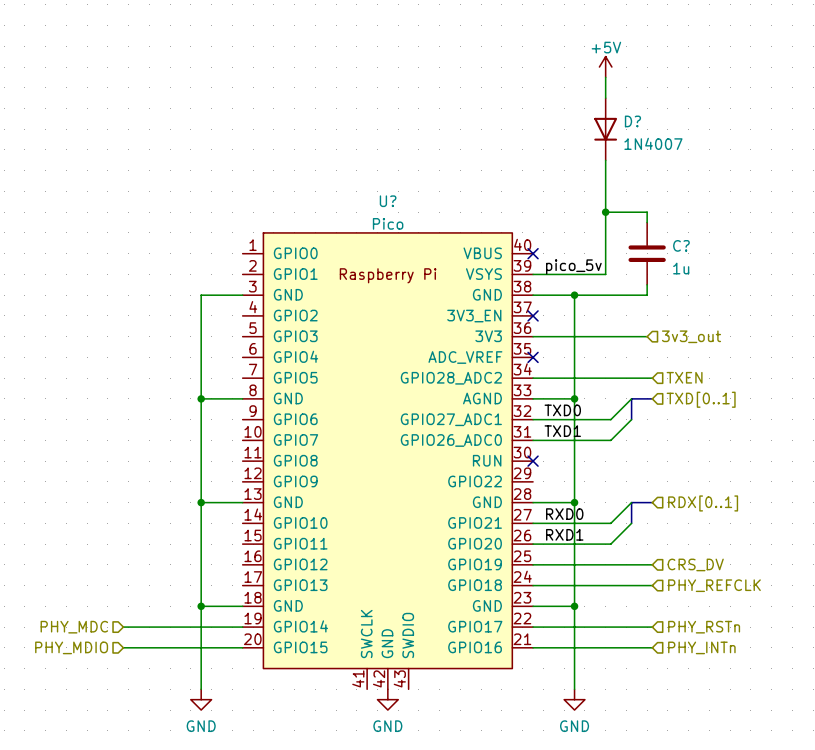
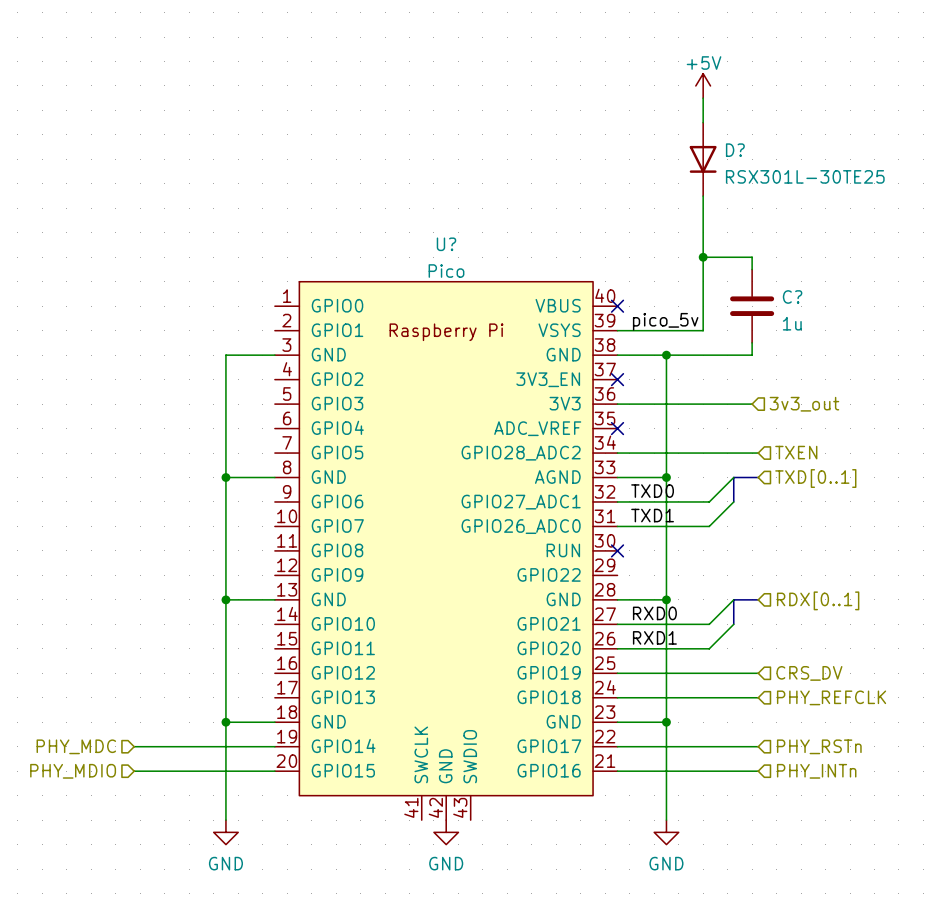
D? value: 1N4007 (653, 143) -> RSX301L-30TE25 (805, 176)

